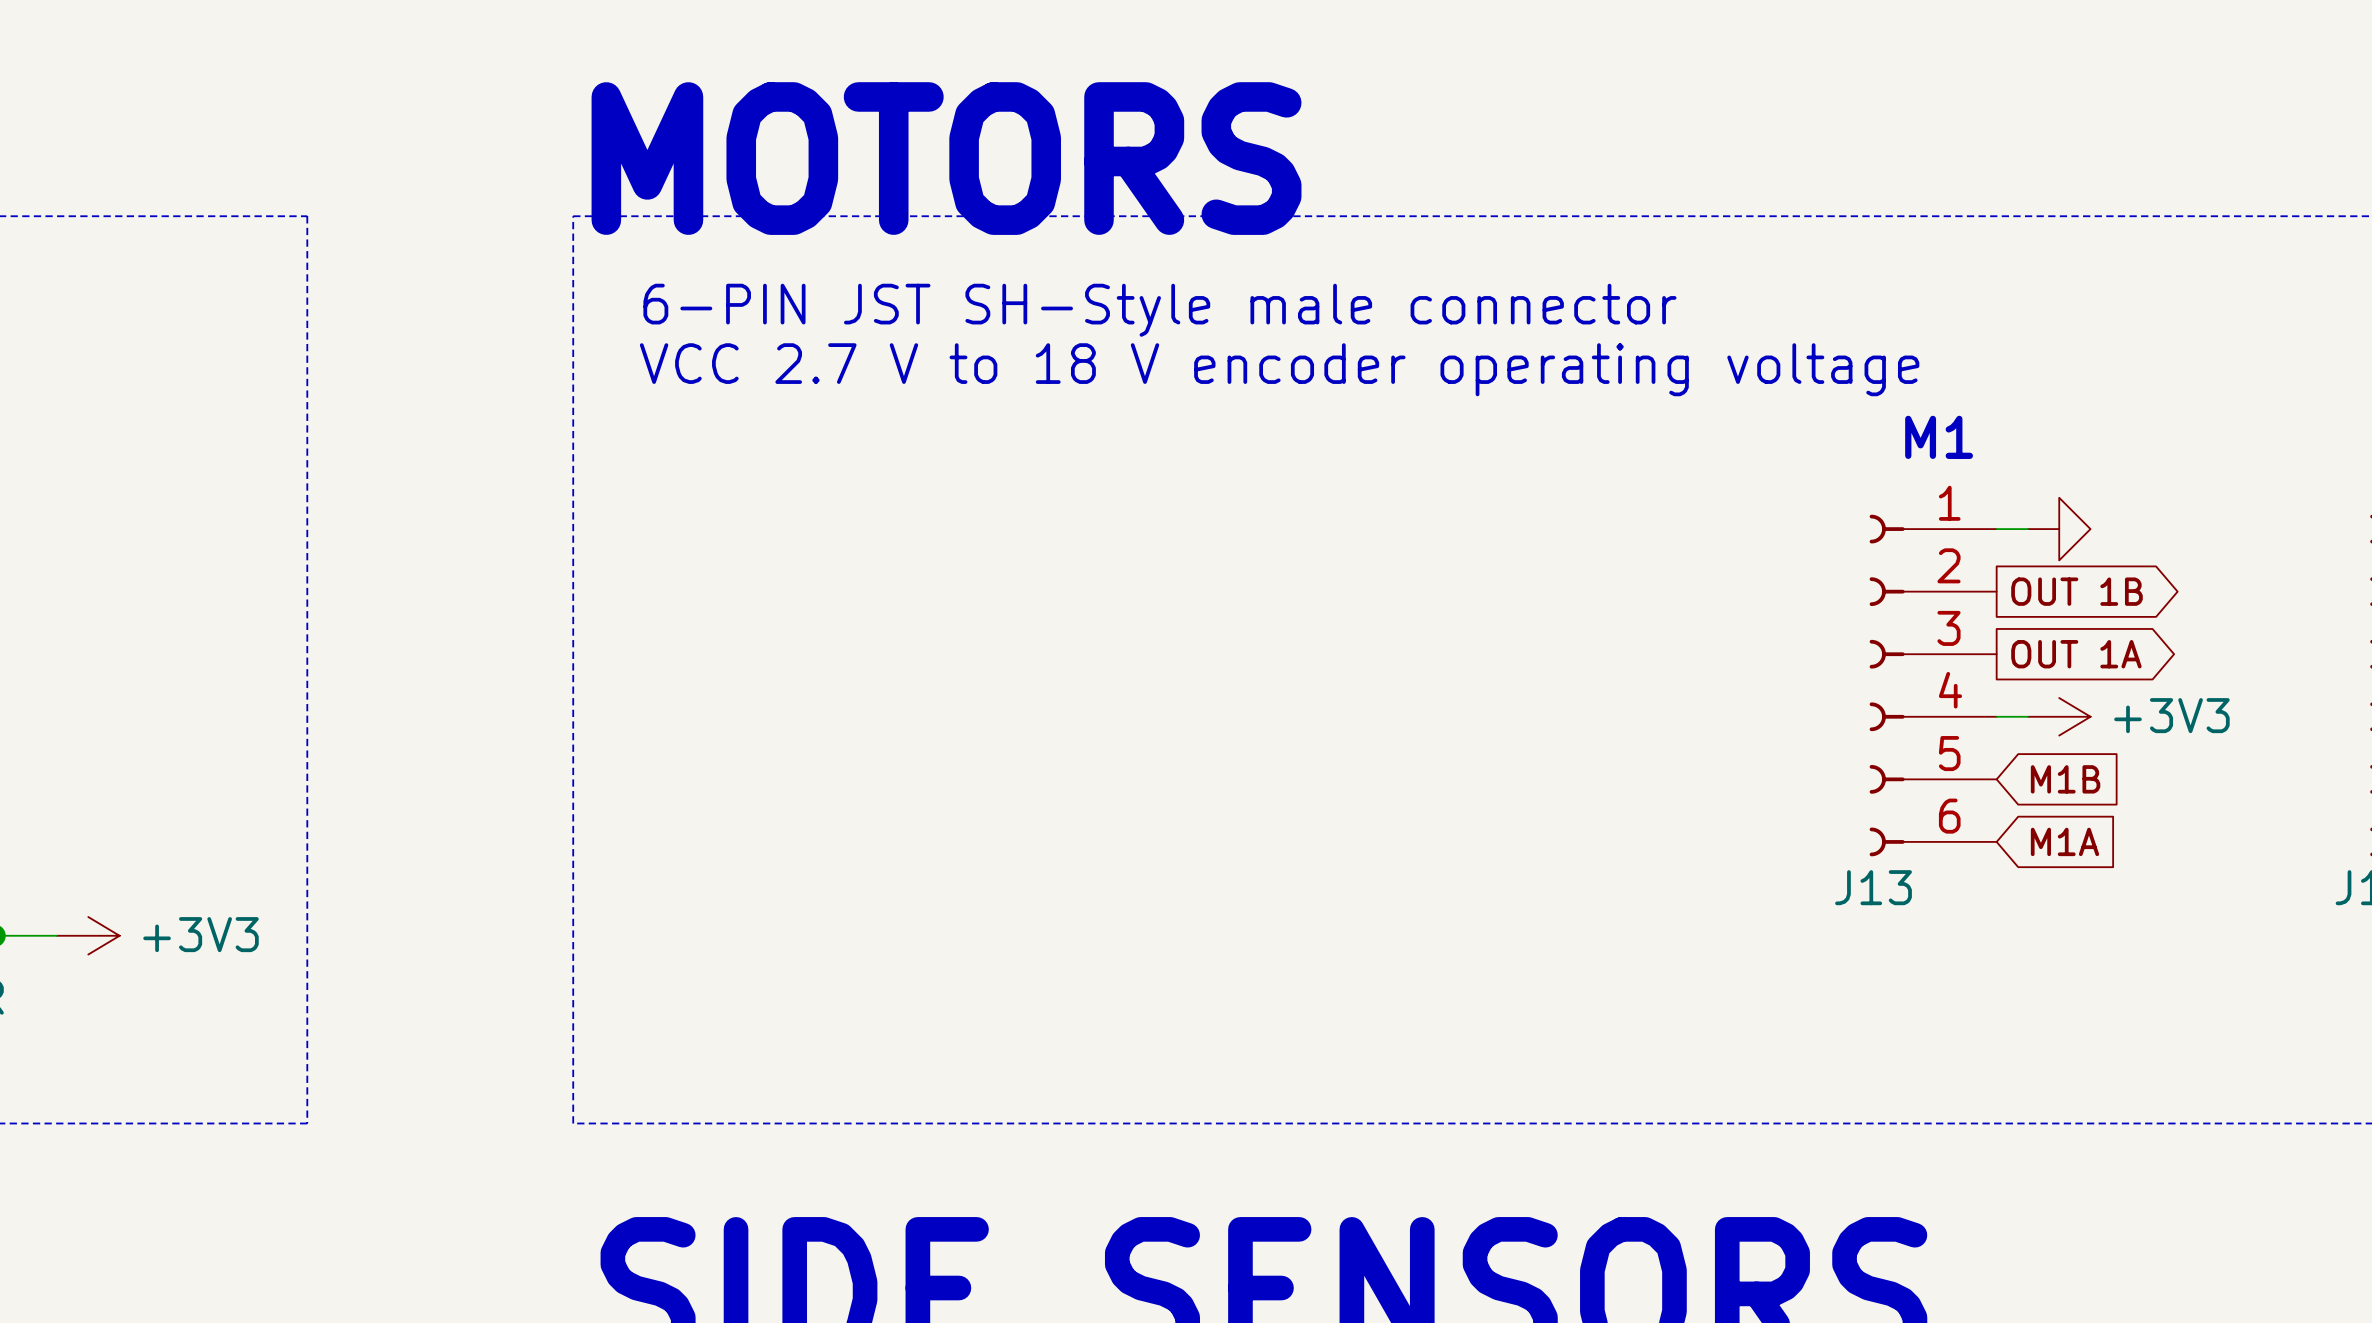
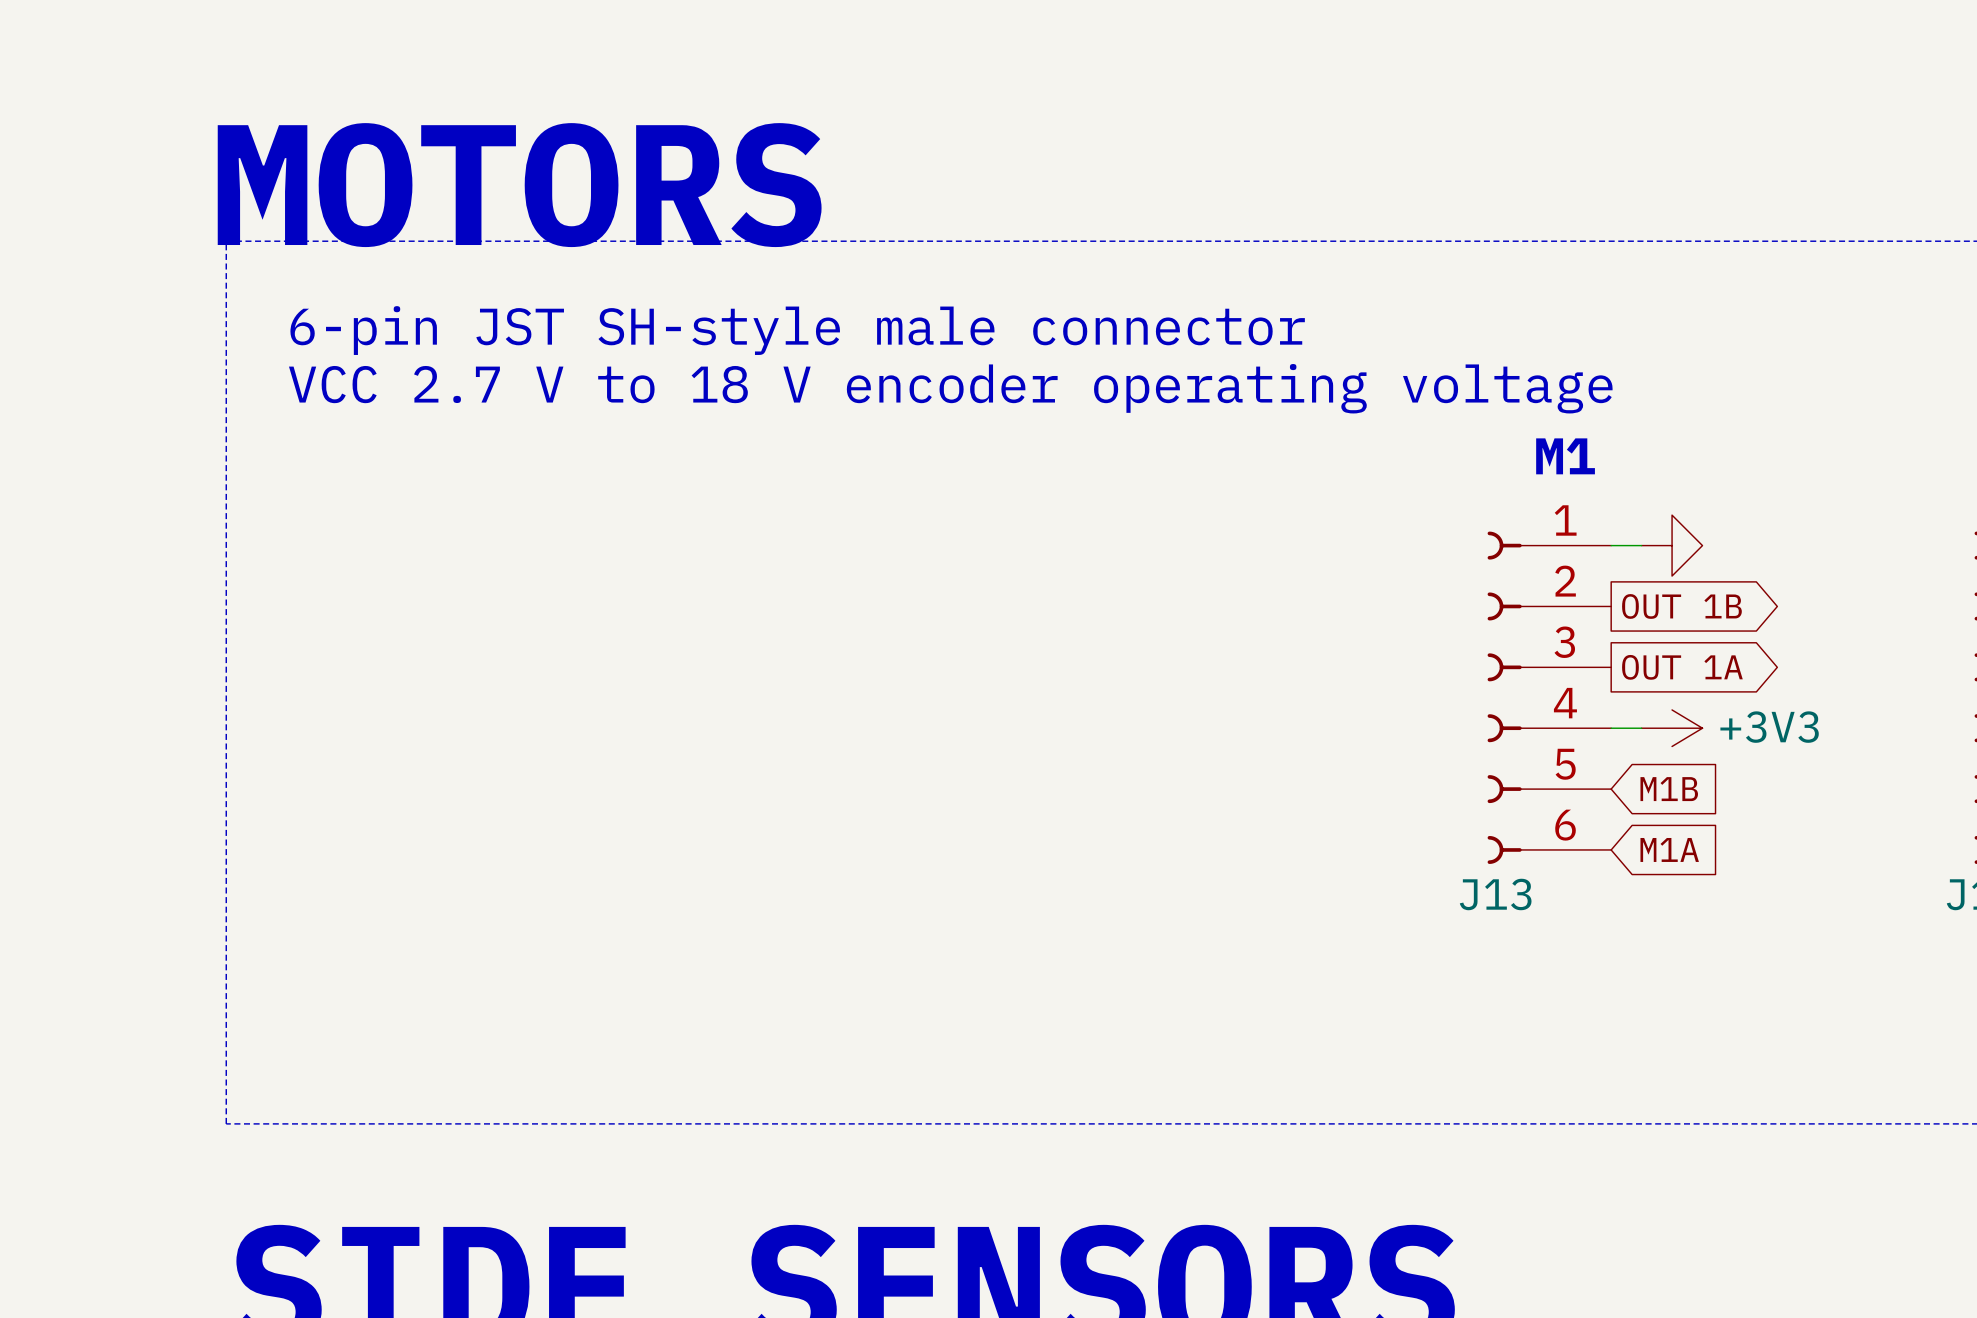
text: 6-PIN JST SH-Style male connector (1159, 310) -> 6-pin JST SH-style male connector (797, 330)

